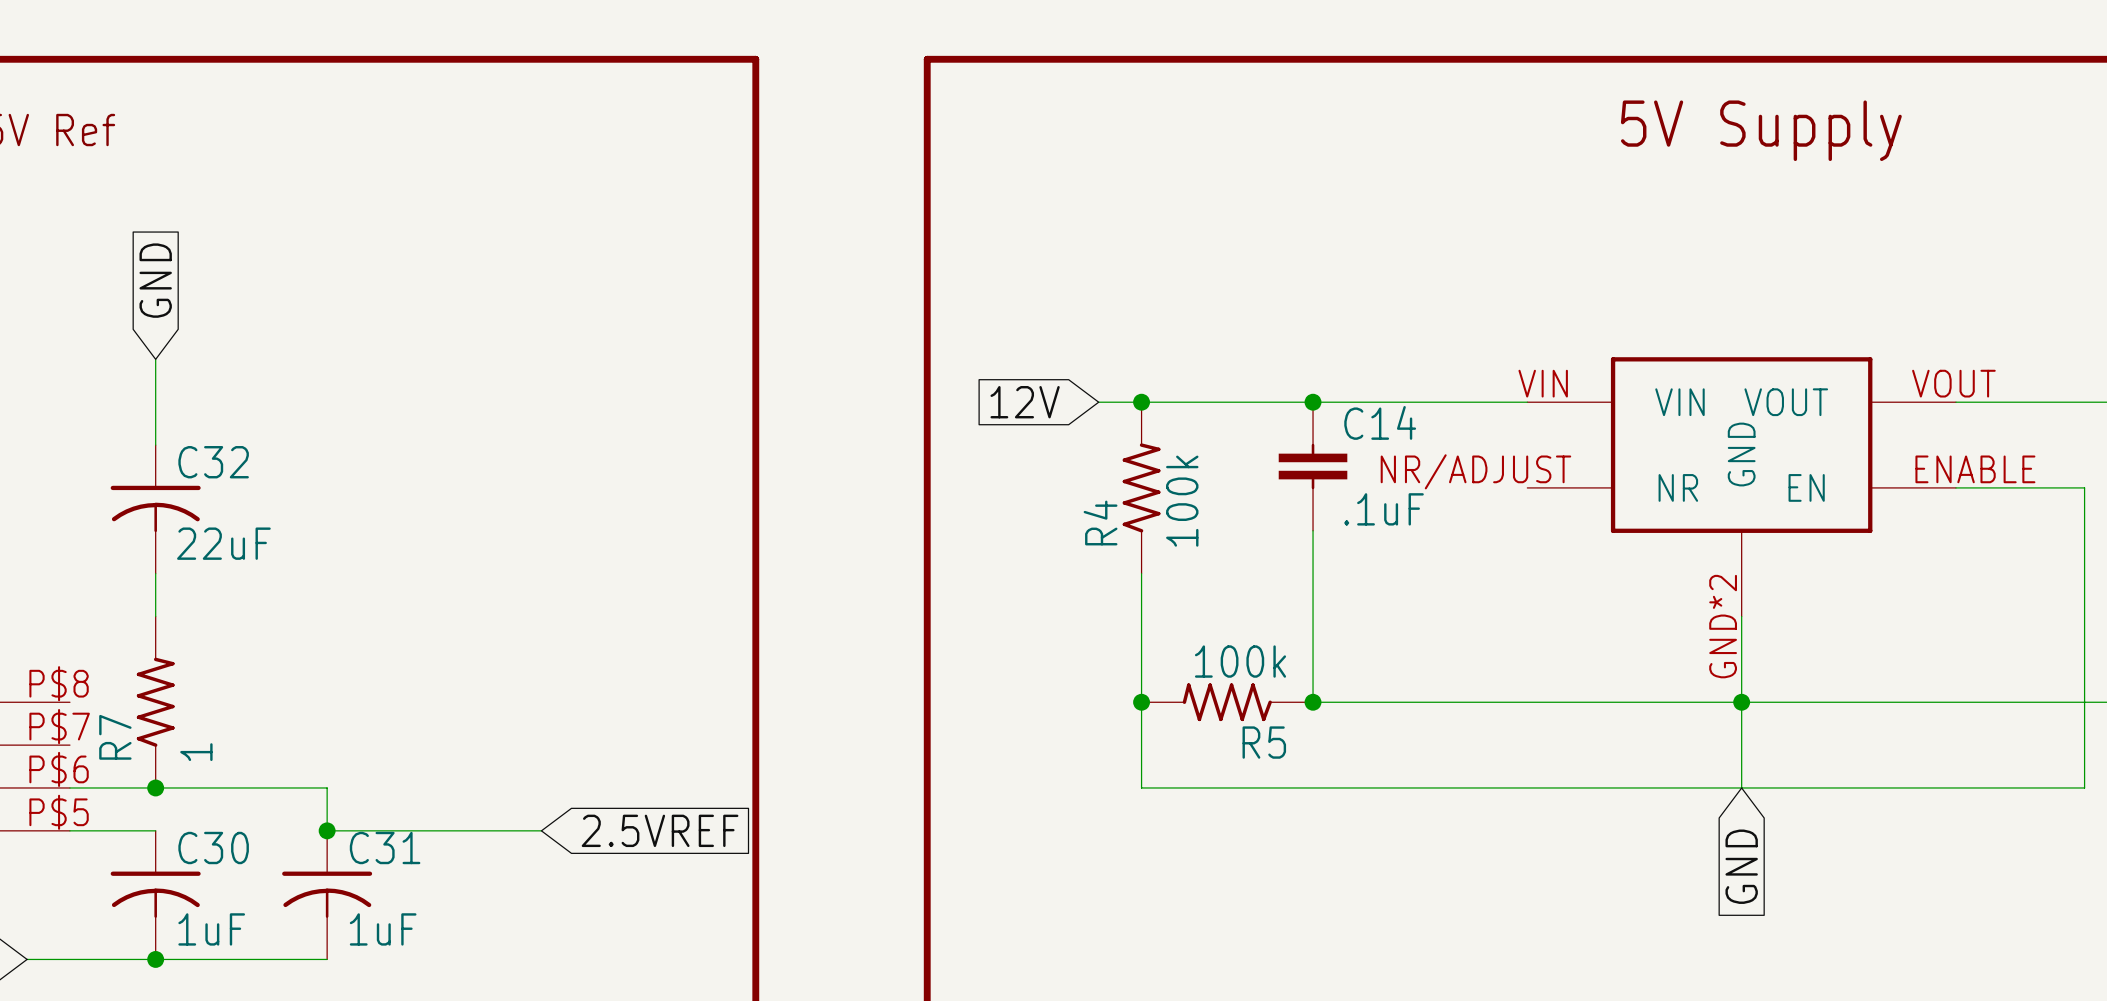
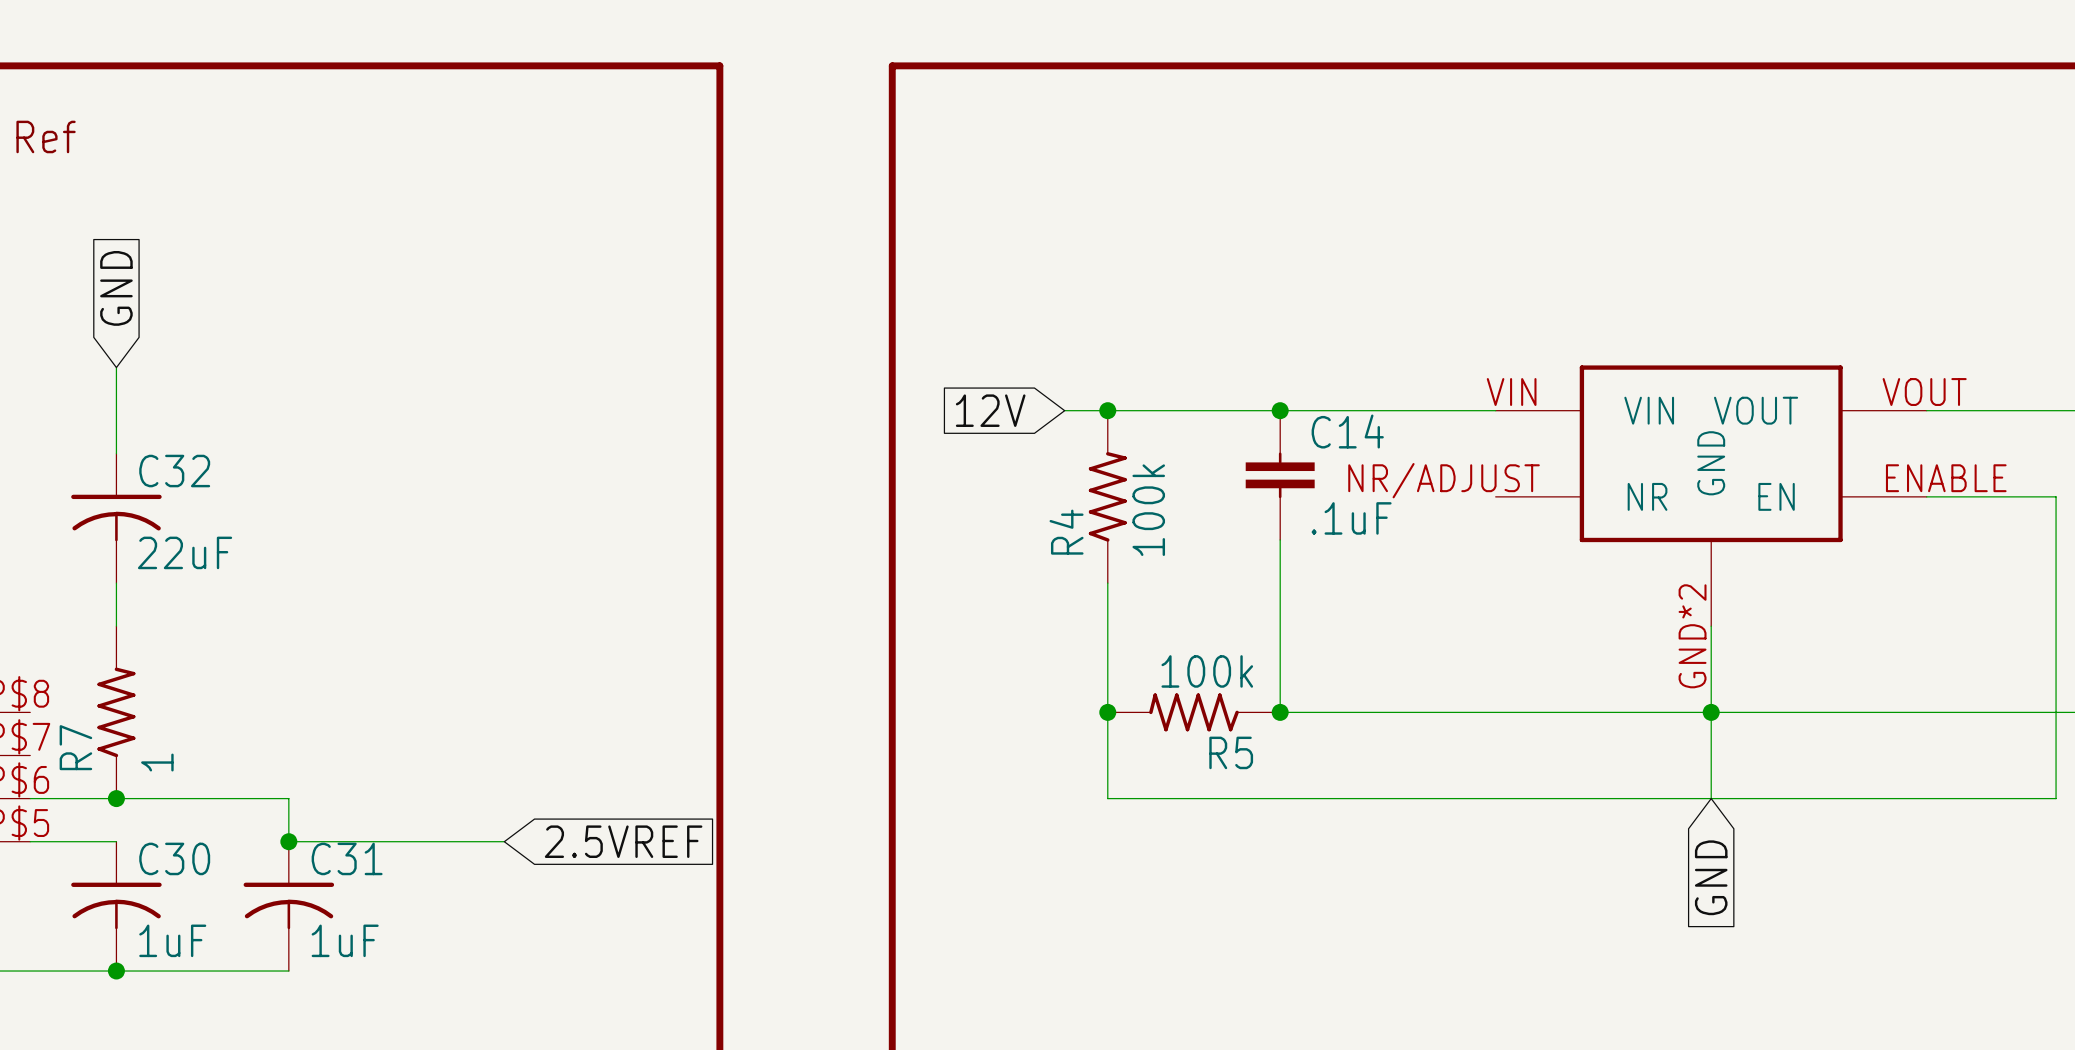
text: 5V Supply (1761, 130) -> none

